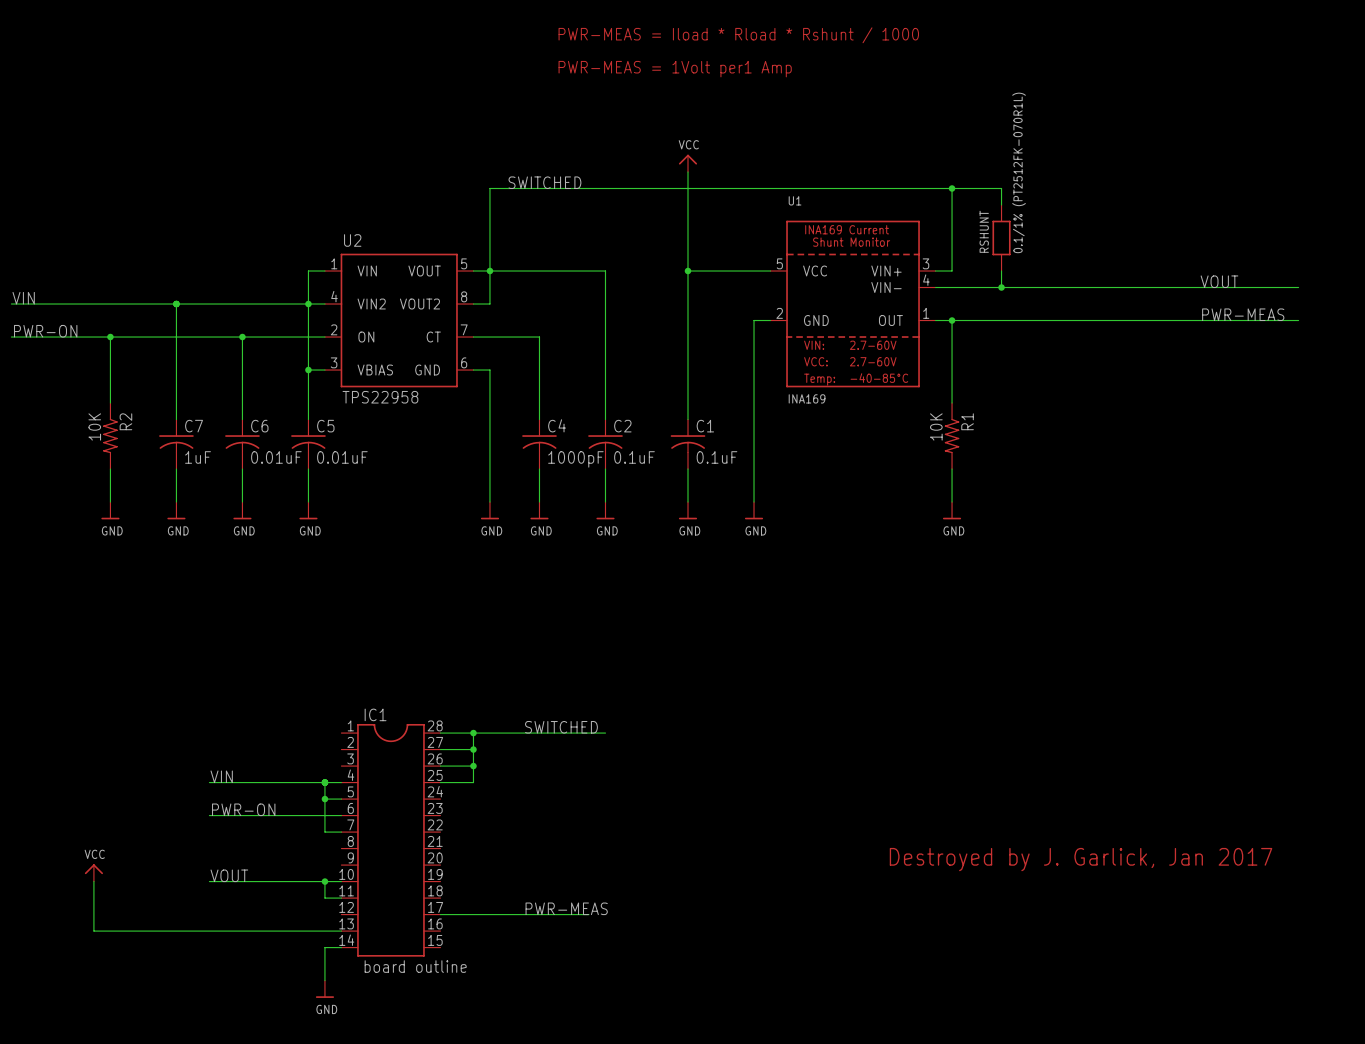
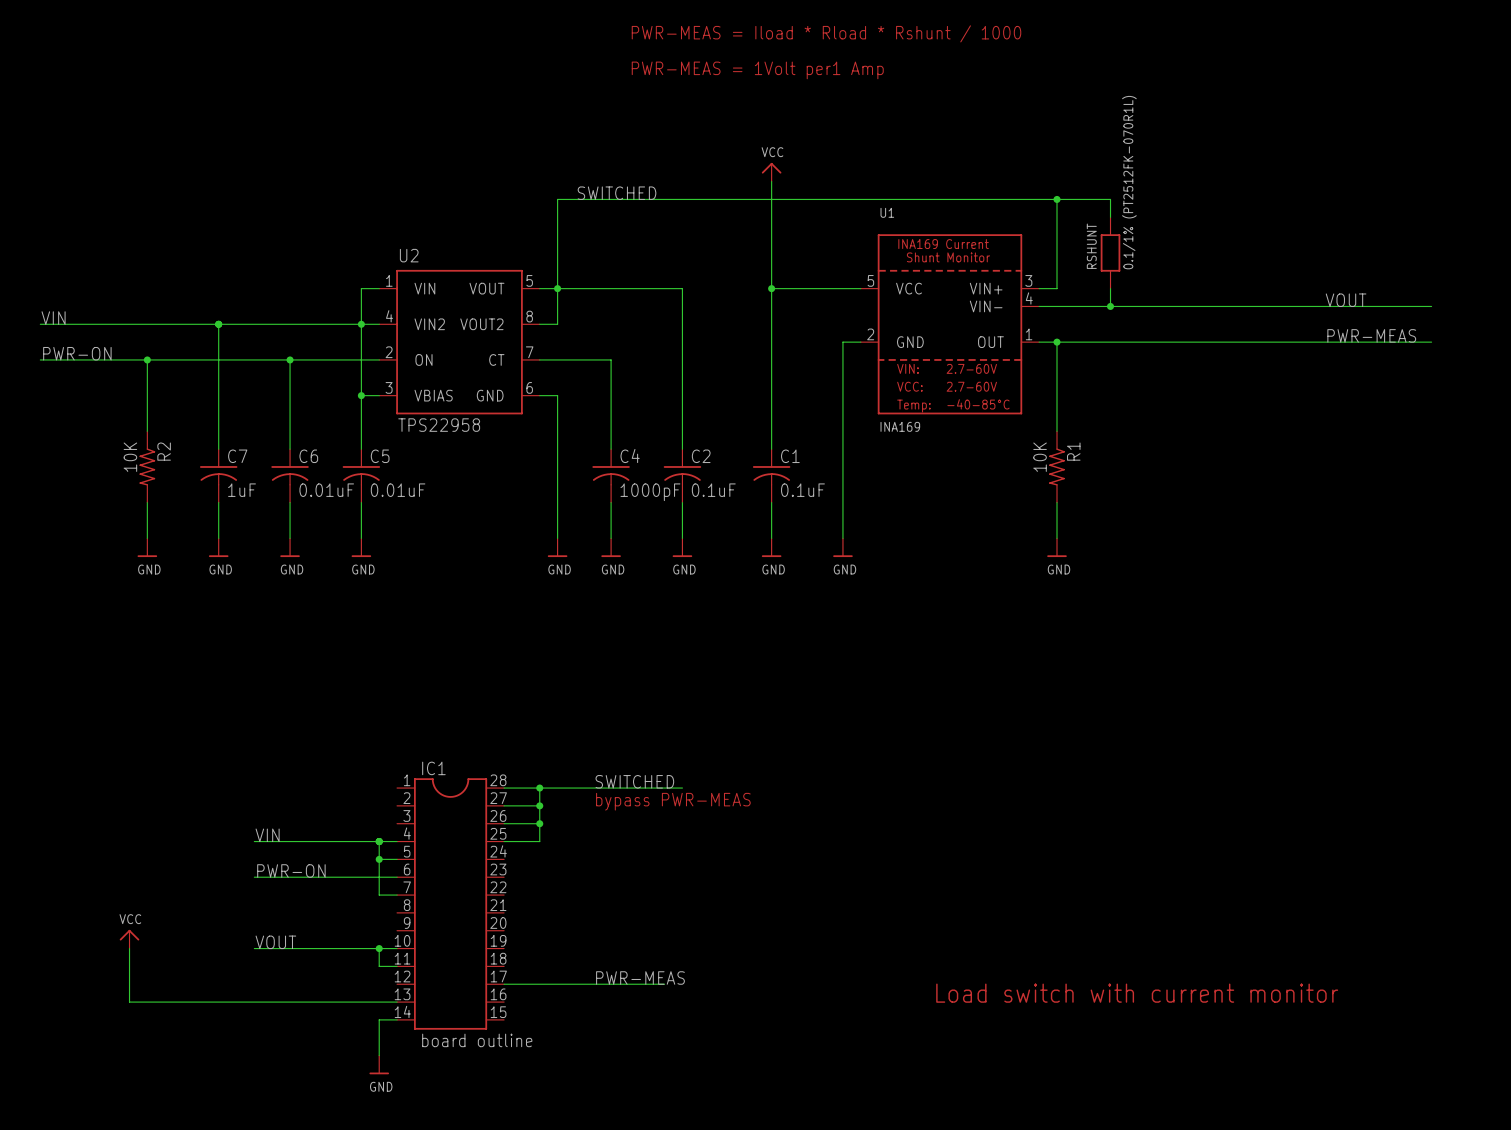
text: none -> bypass PWR-MEAS (673, 801)
text: Destroyed by J. Garlick, Jan 2017 (1081, 859) -> none
text: none -> Load switch with current monitor (1137, 993)

